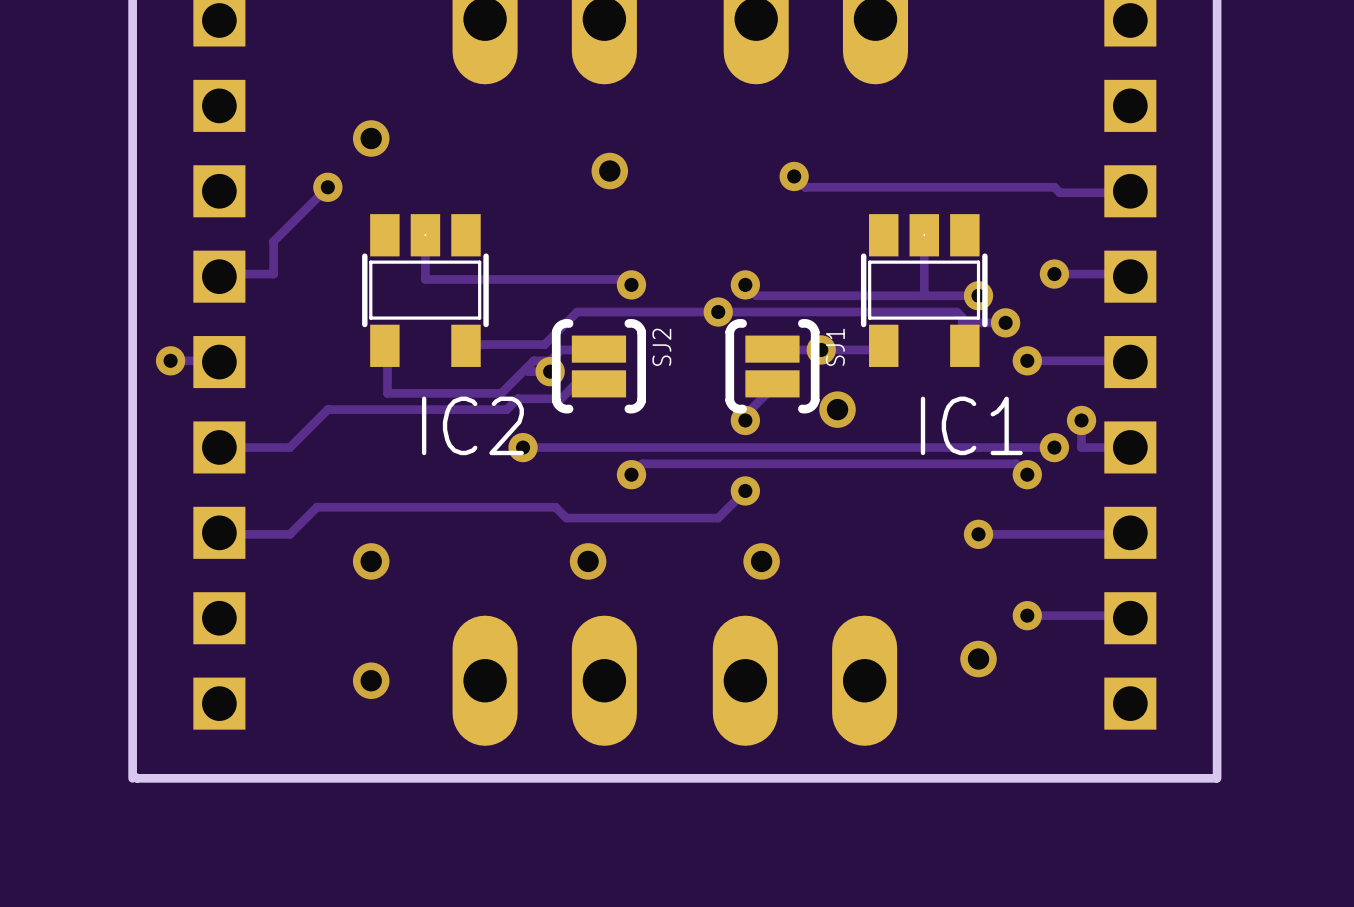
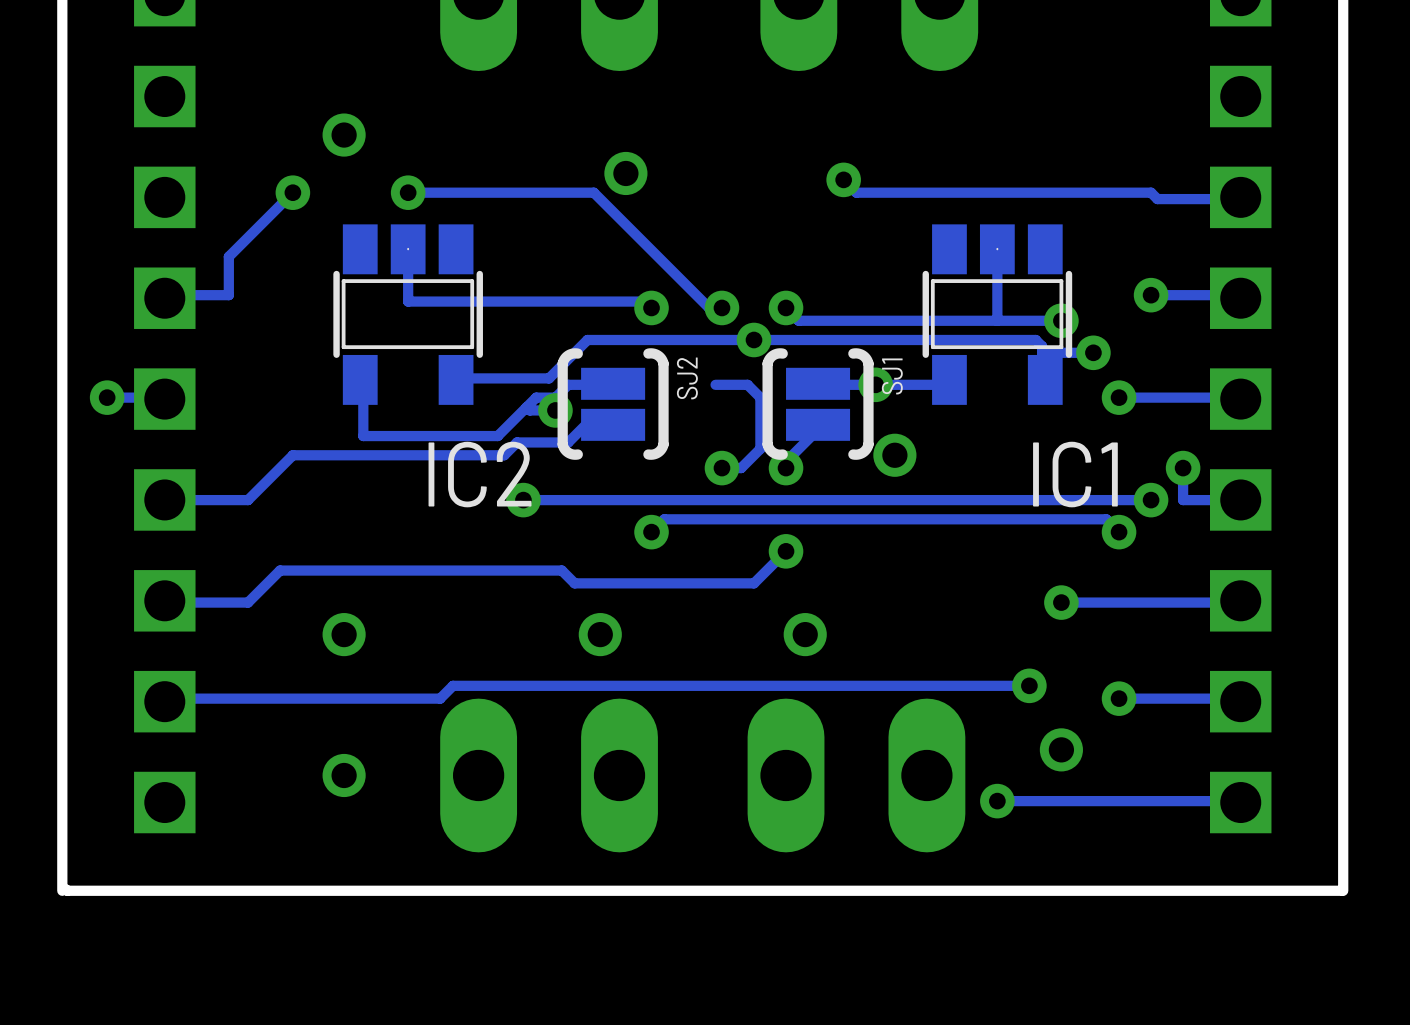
track: none -> (408, 192) (593, 192) (709, 307) (721, 307)
via: none -> (408, 192)
via: none -> (721, 307)
track: none -> (715, 384) (747, 384) (760, 397) (760, 448) (741, 468) (721, 468)
via: none -> (721, 468)
track: none -> (1029, 685) (452, 685) (440, 698) (164, 698) (164, 701)
via: none -> (1029, 685)
track: none -> (997, 801) (1240, 802)
via: none -> (997, 801)

